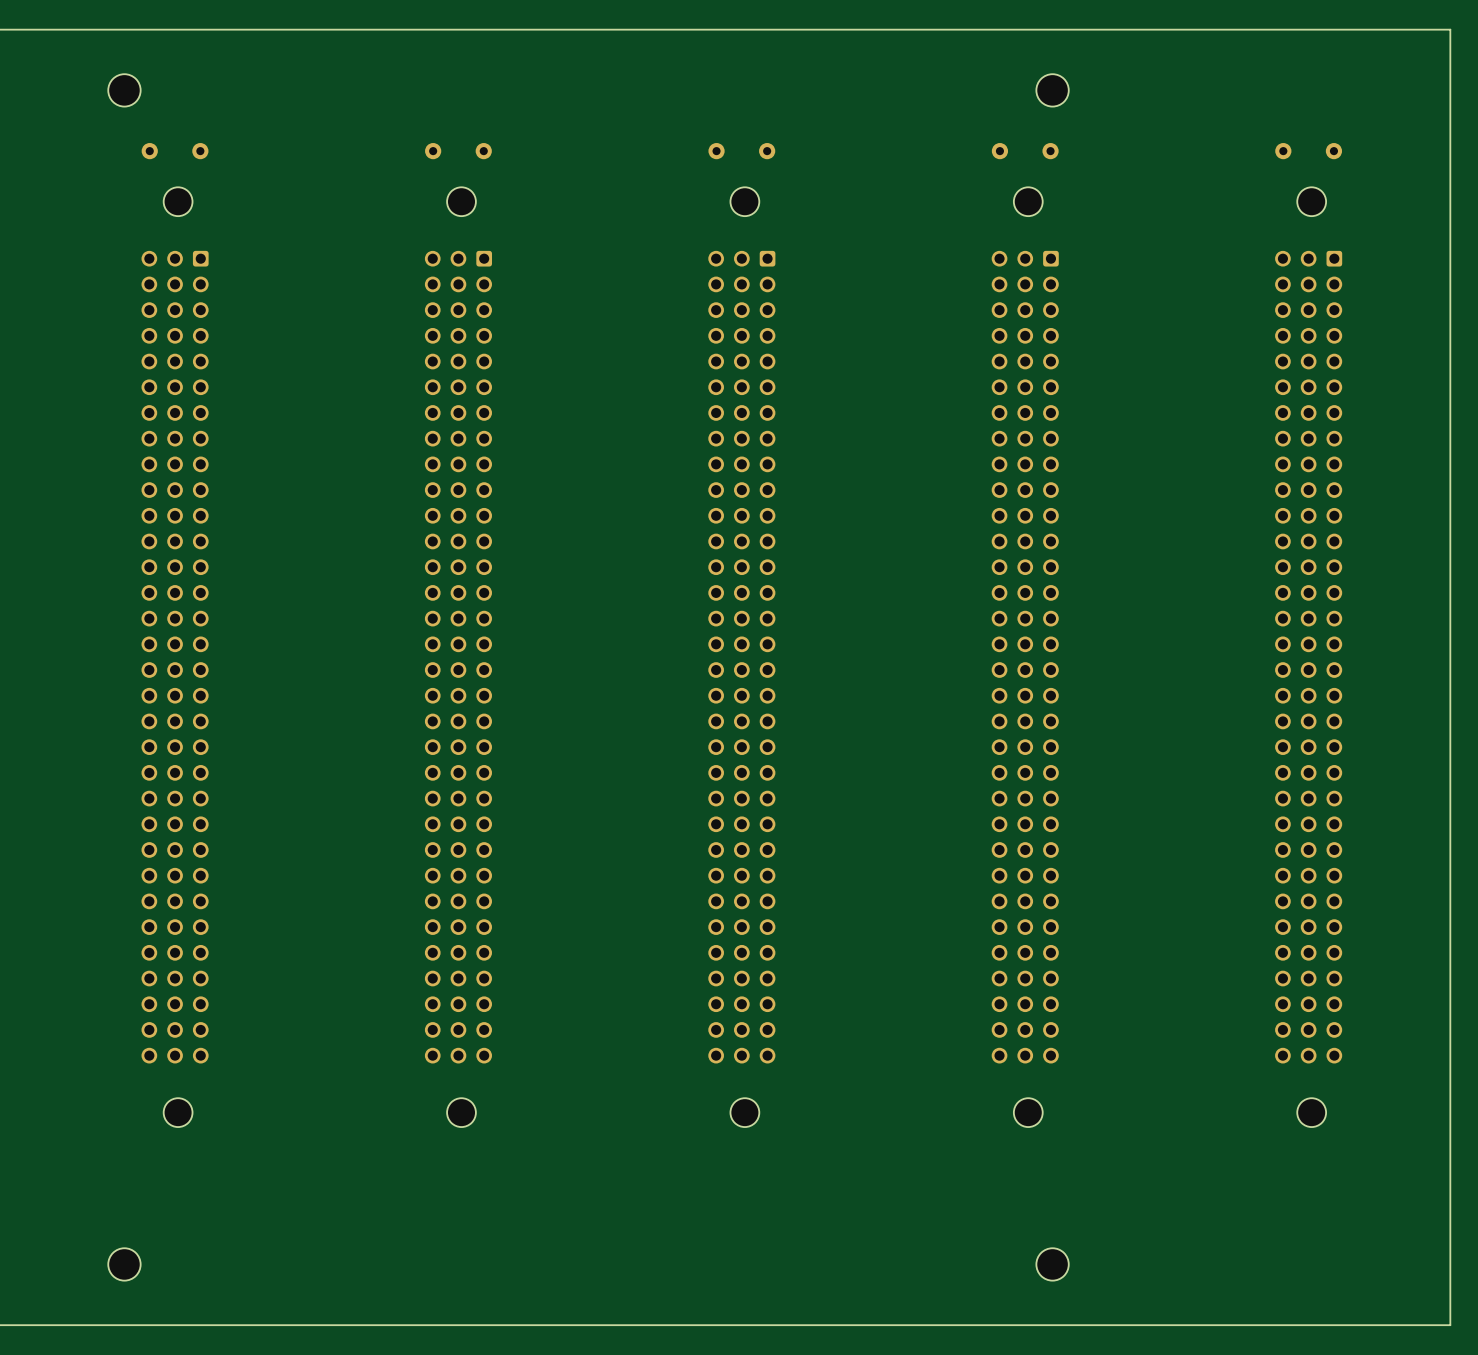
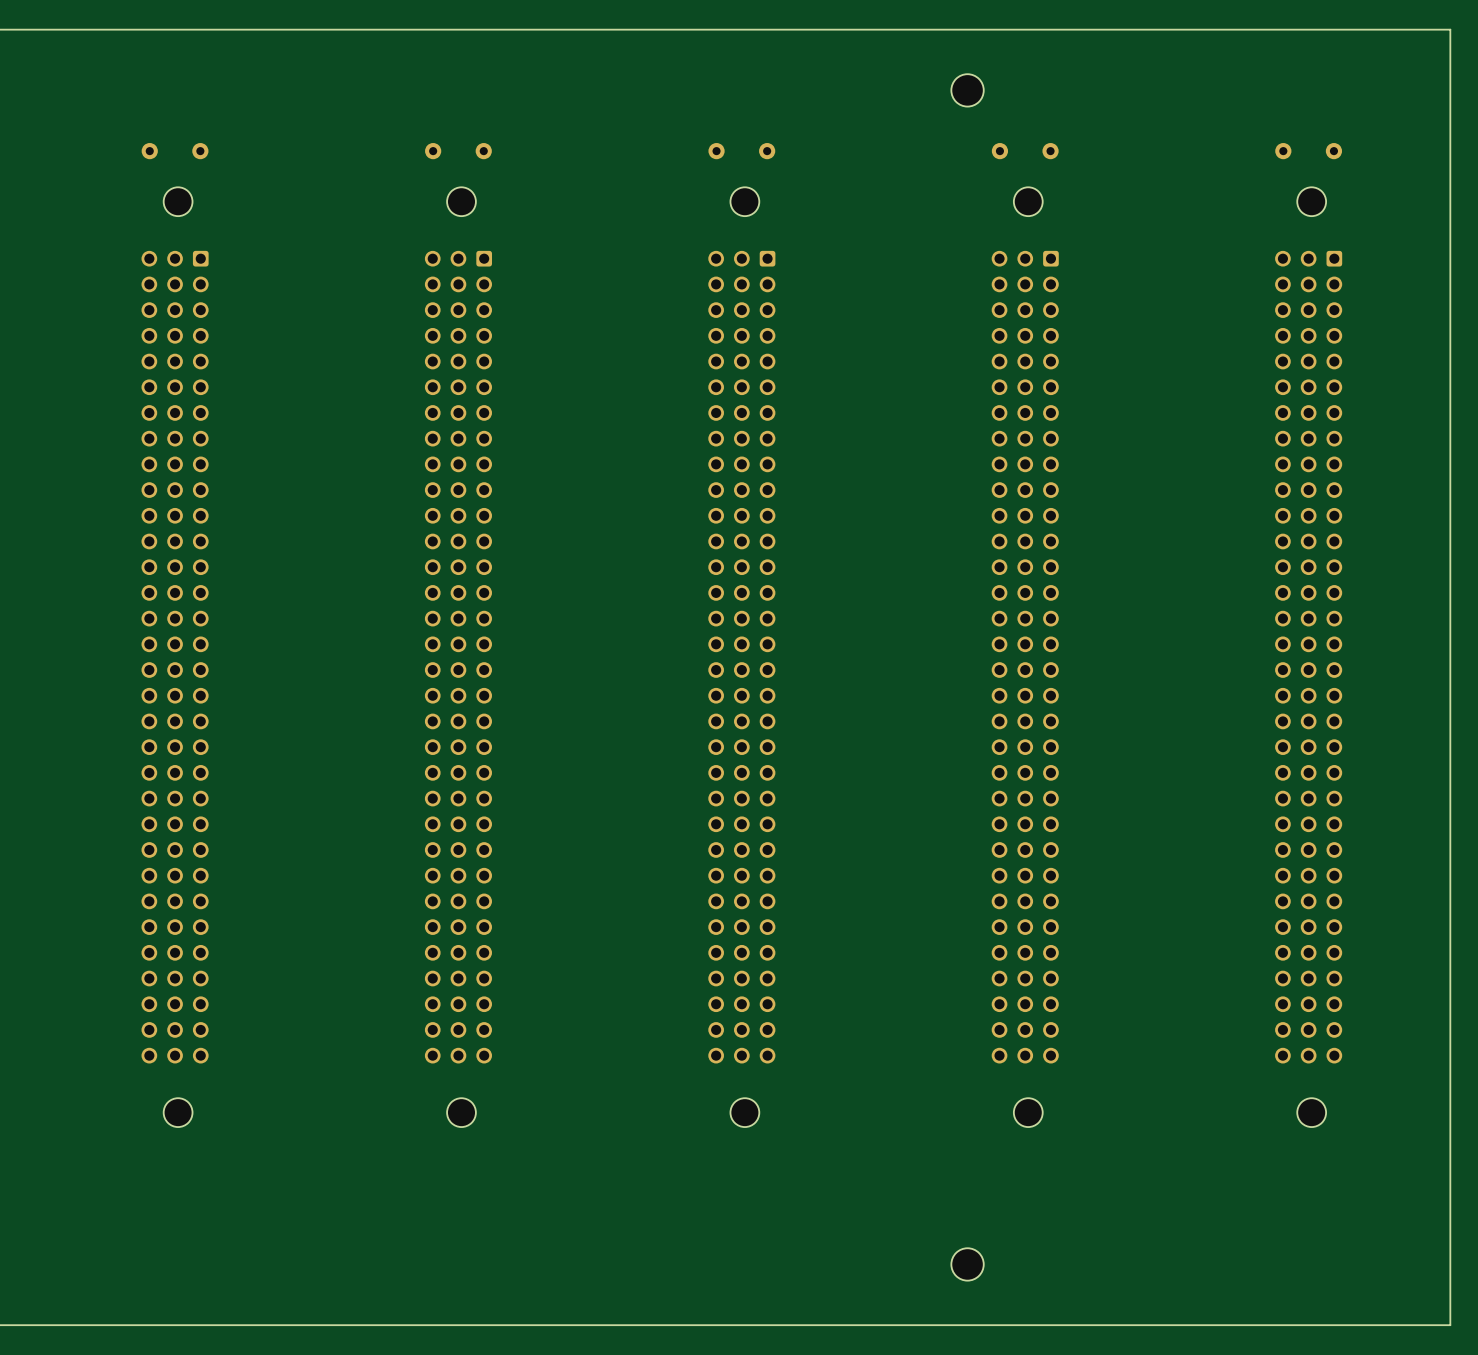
part: (124, 90) -> none
part position: (1052, 90) -> (967, 90)
part: (124, 1264) -> none
part position: (1052, 1264) -> (967, 1264)

